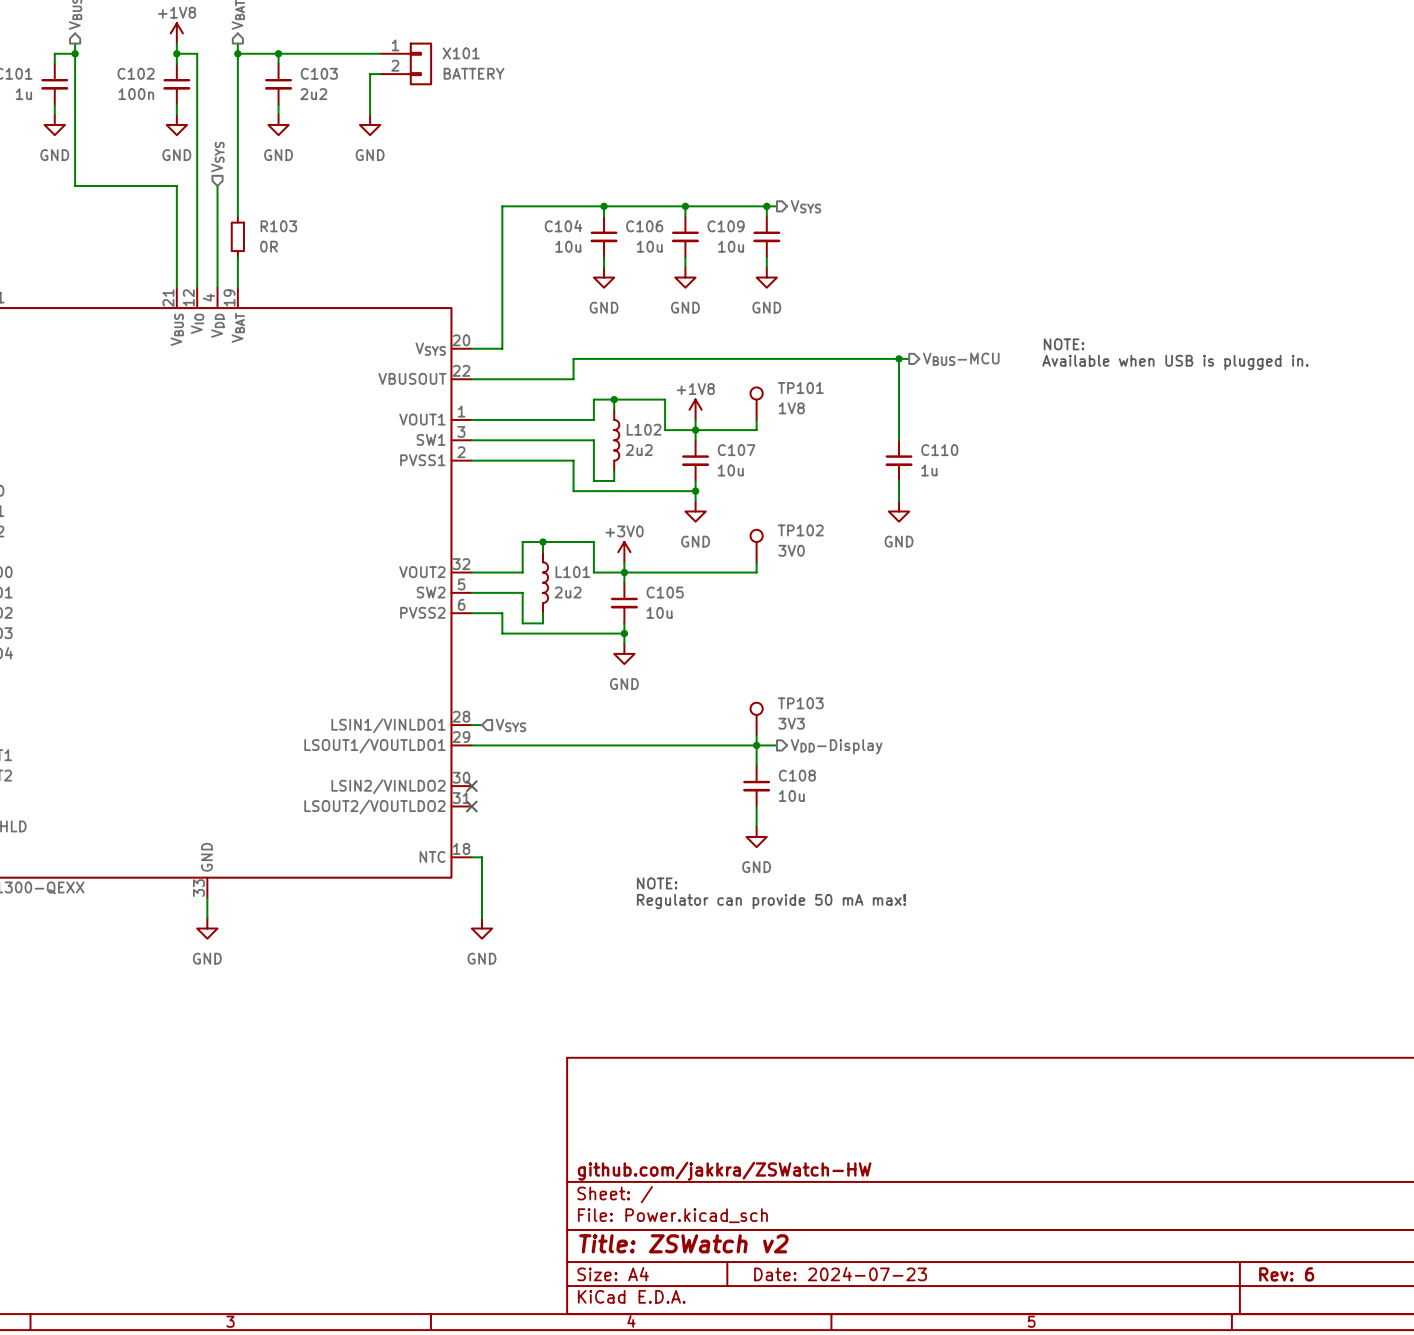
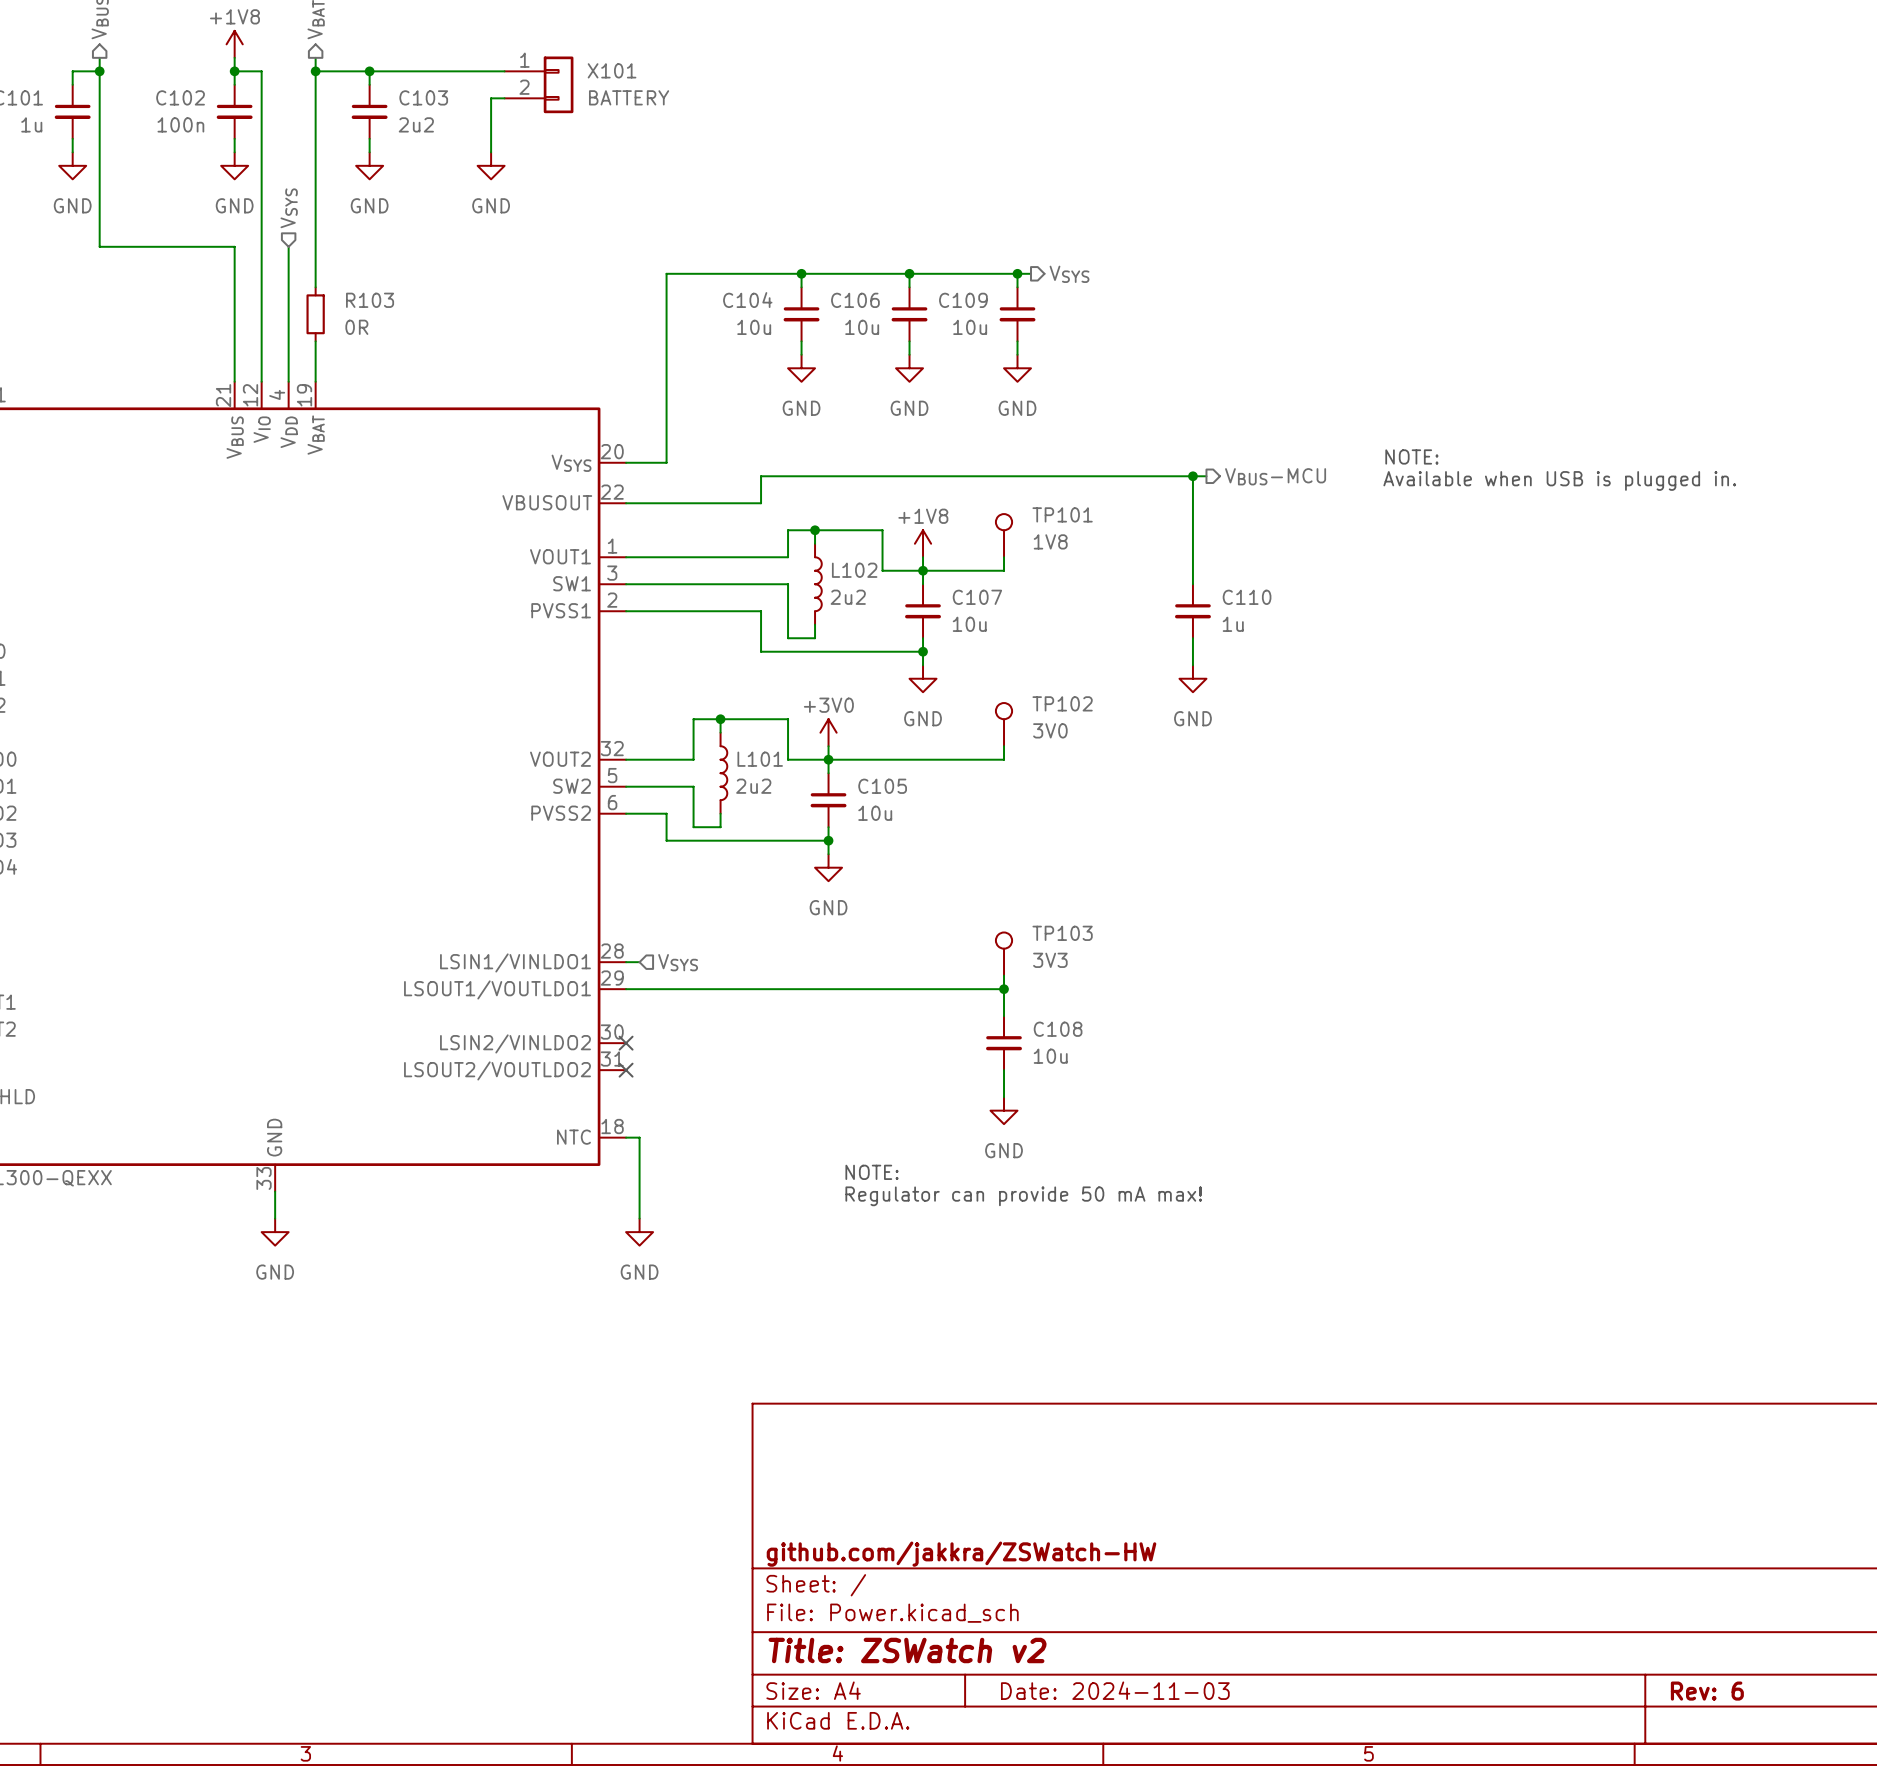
wire: (756, 745) (776, 745) -> none
hierarchical label: VDD-Display (836, 746) -> none
title block: Date: 2024-07-23 (840, 1274) -> Date: 2024-11-03 (1115, 1690)

